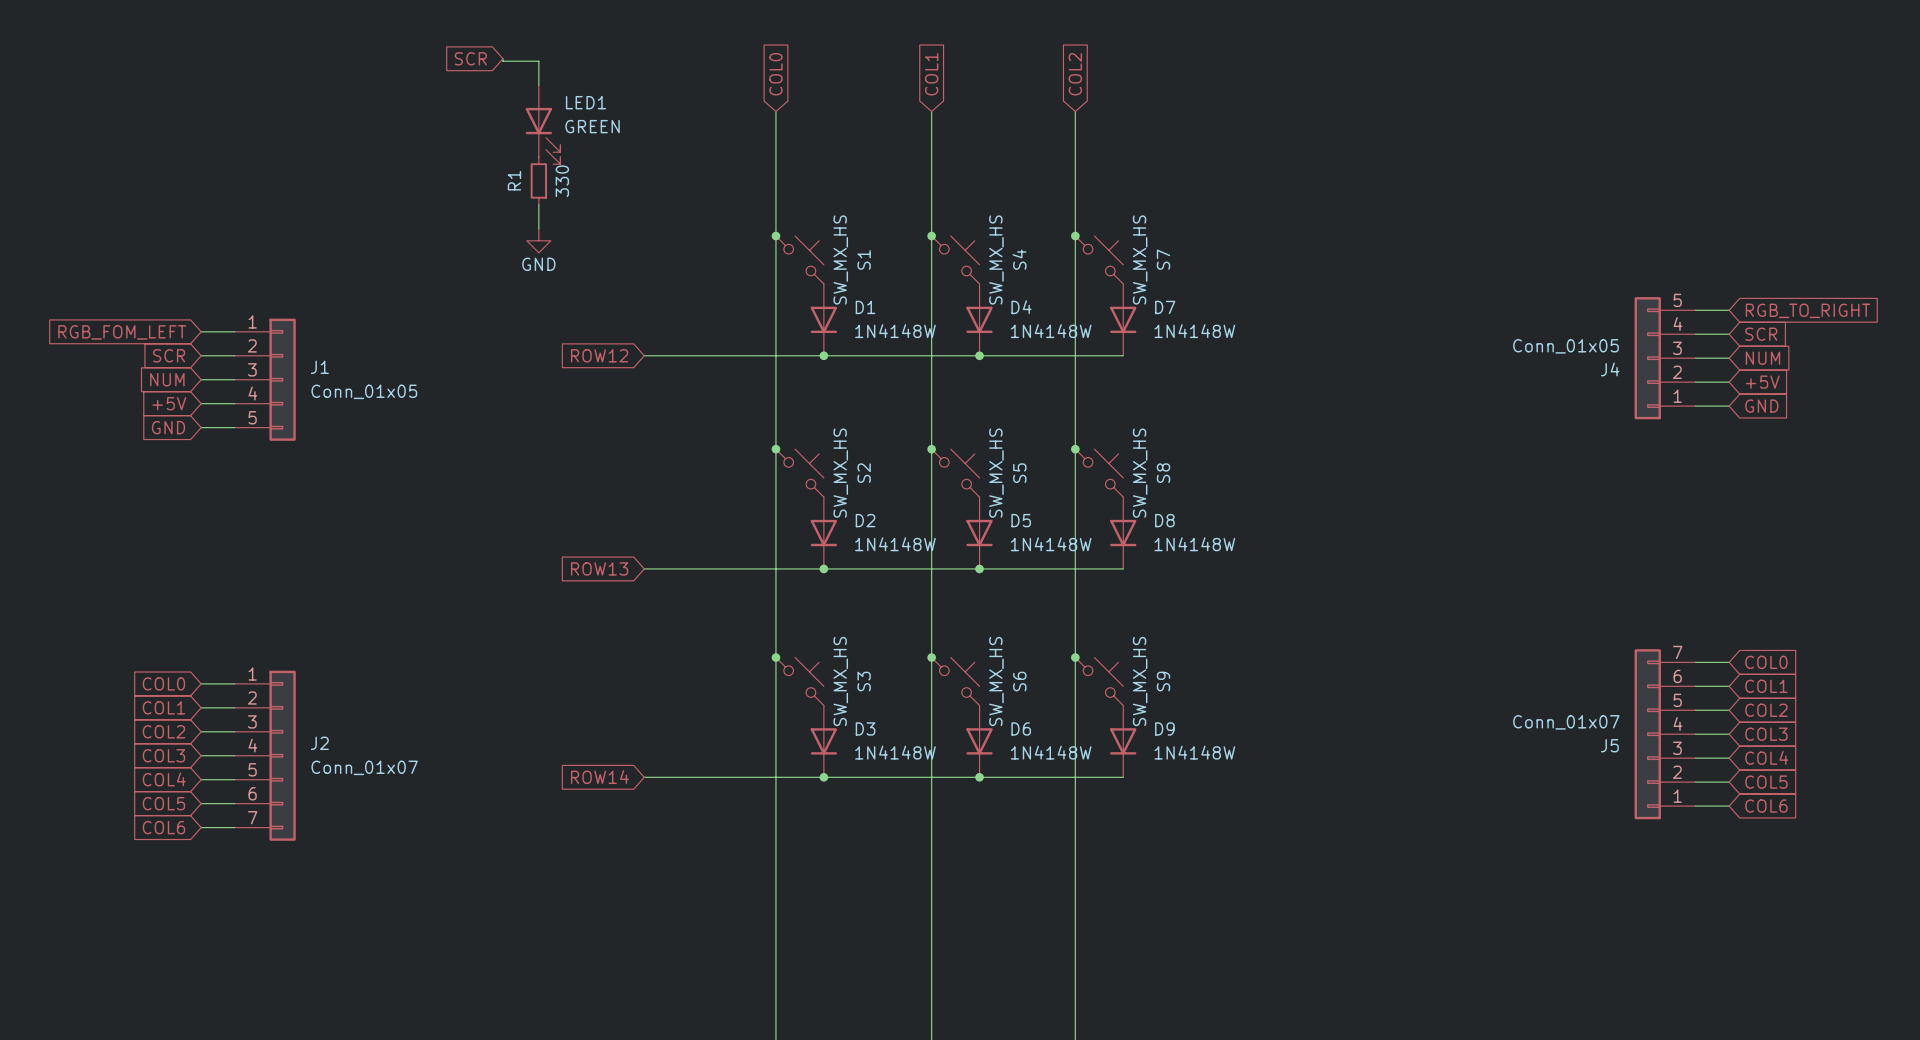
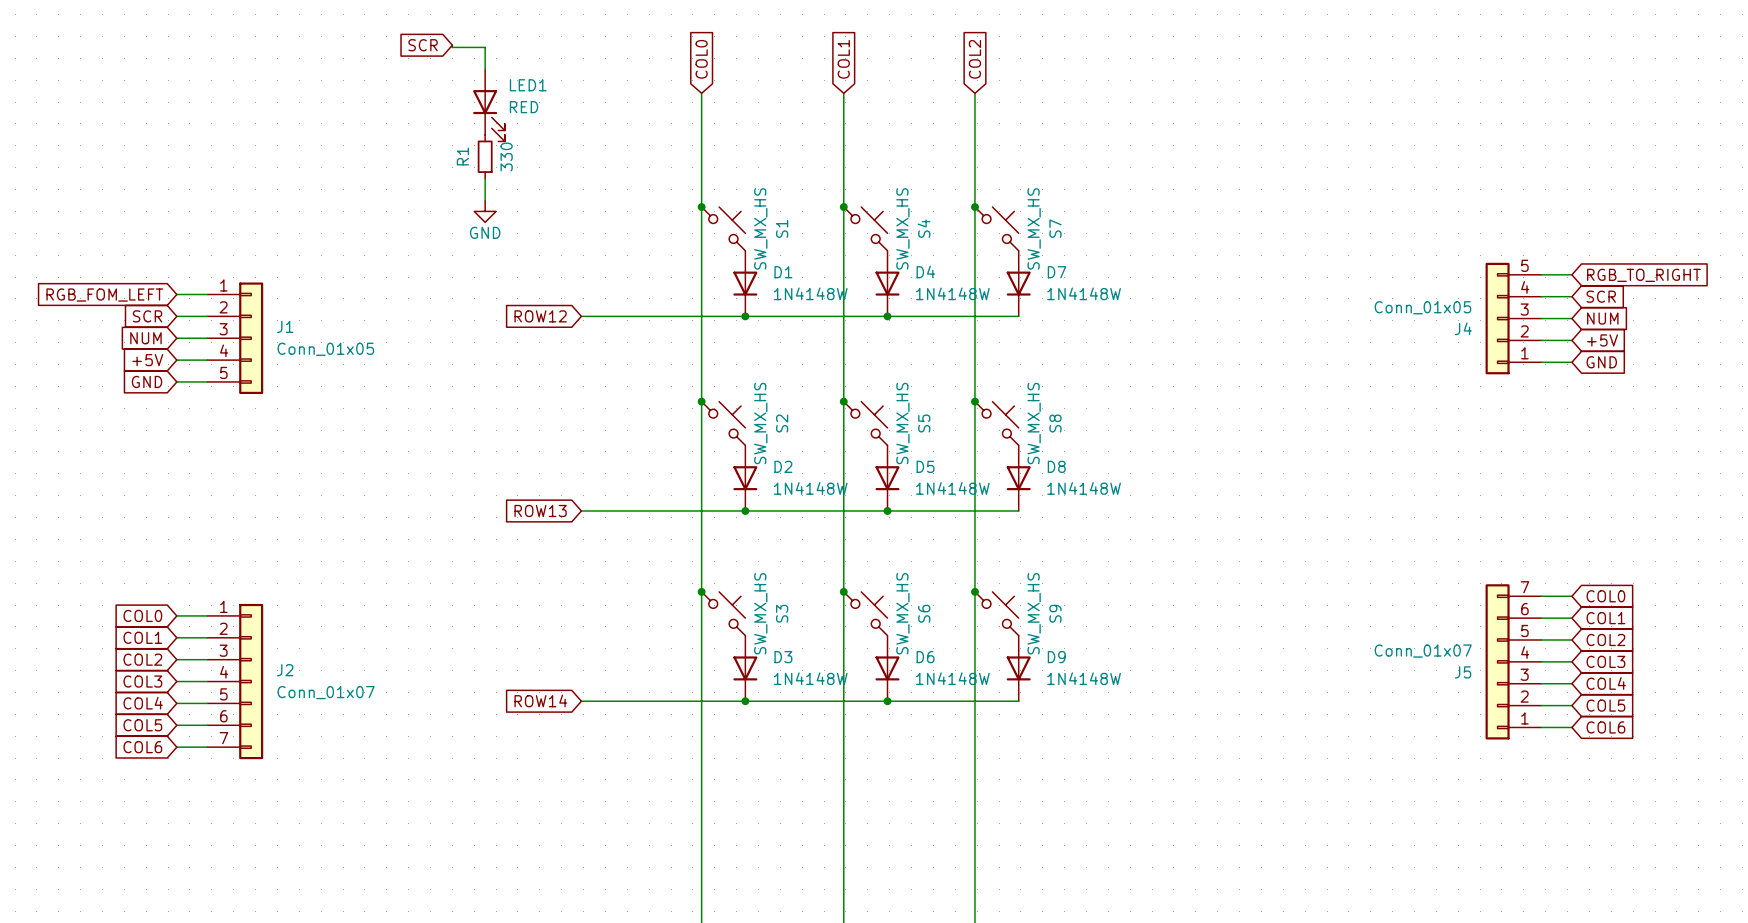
LED1 value: GREEN (592, 126) -> RED (524, 107)

